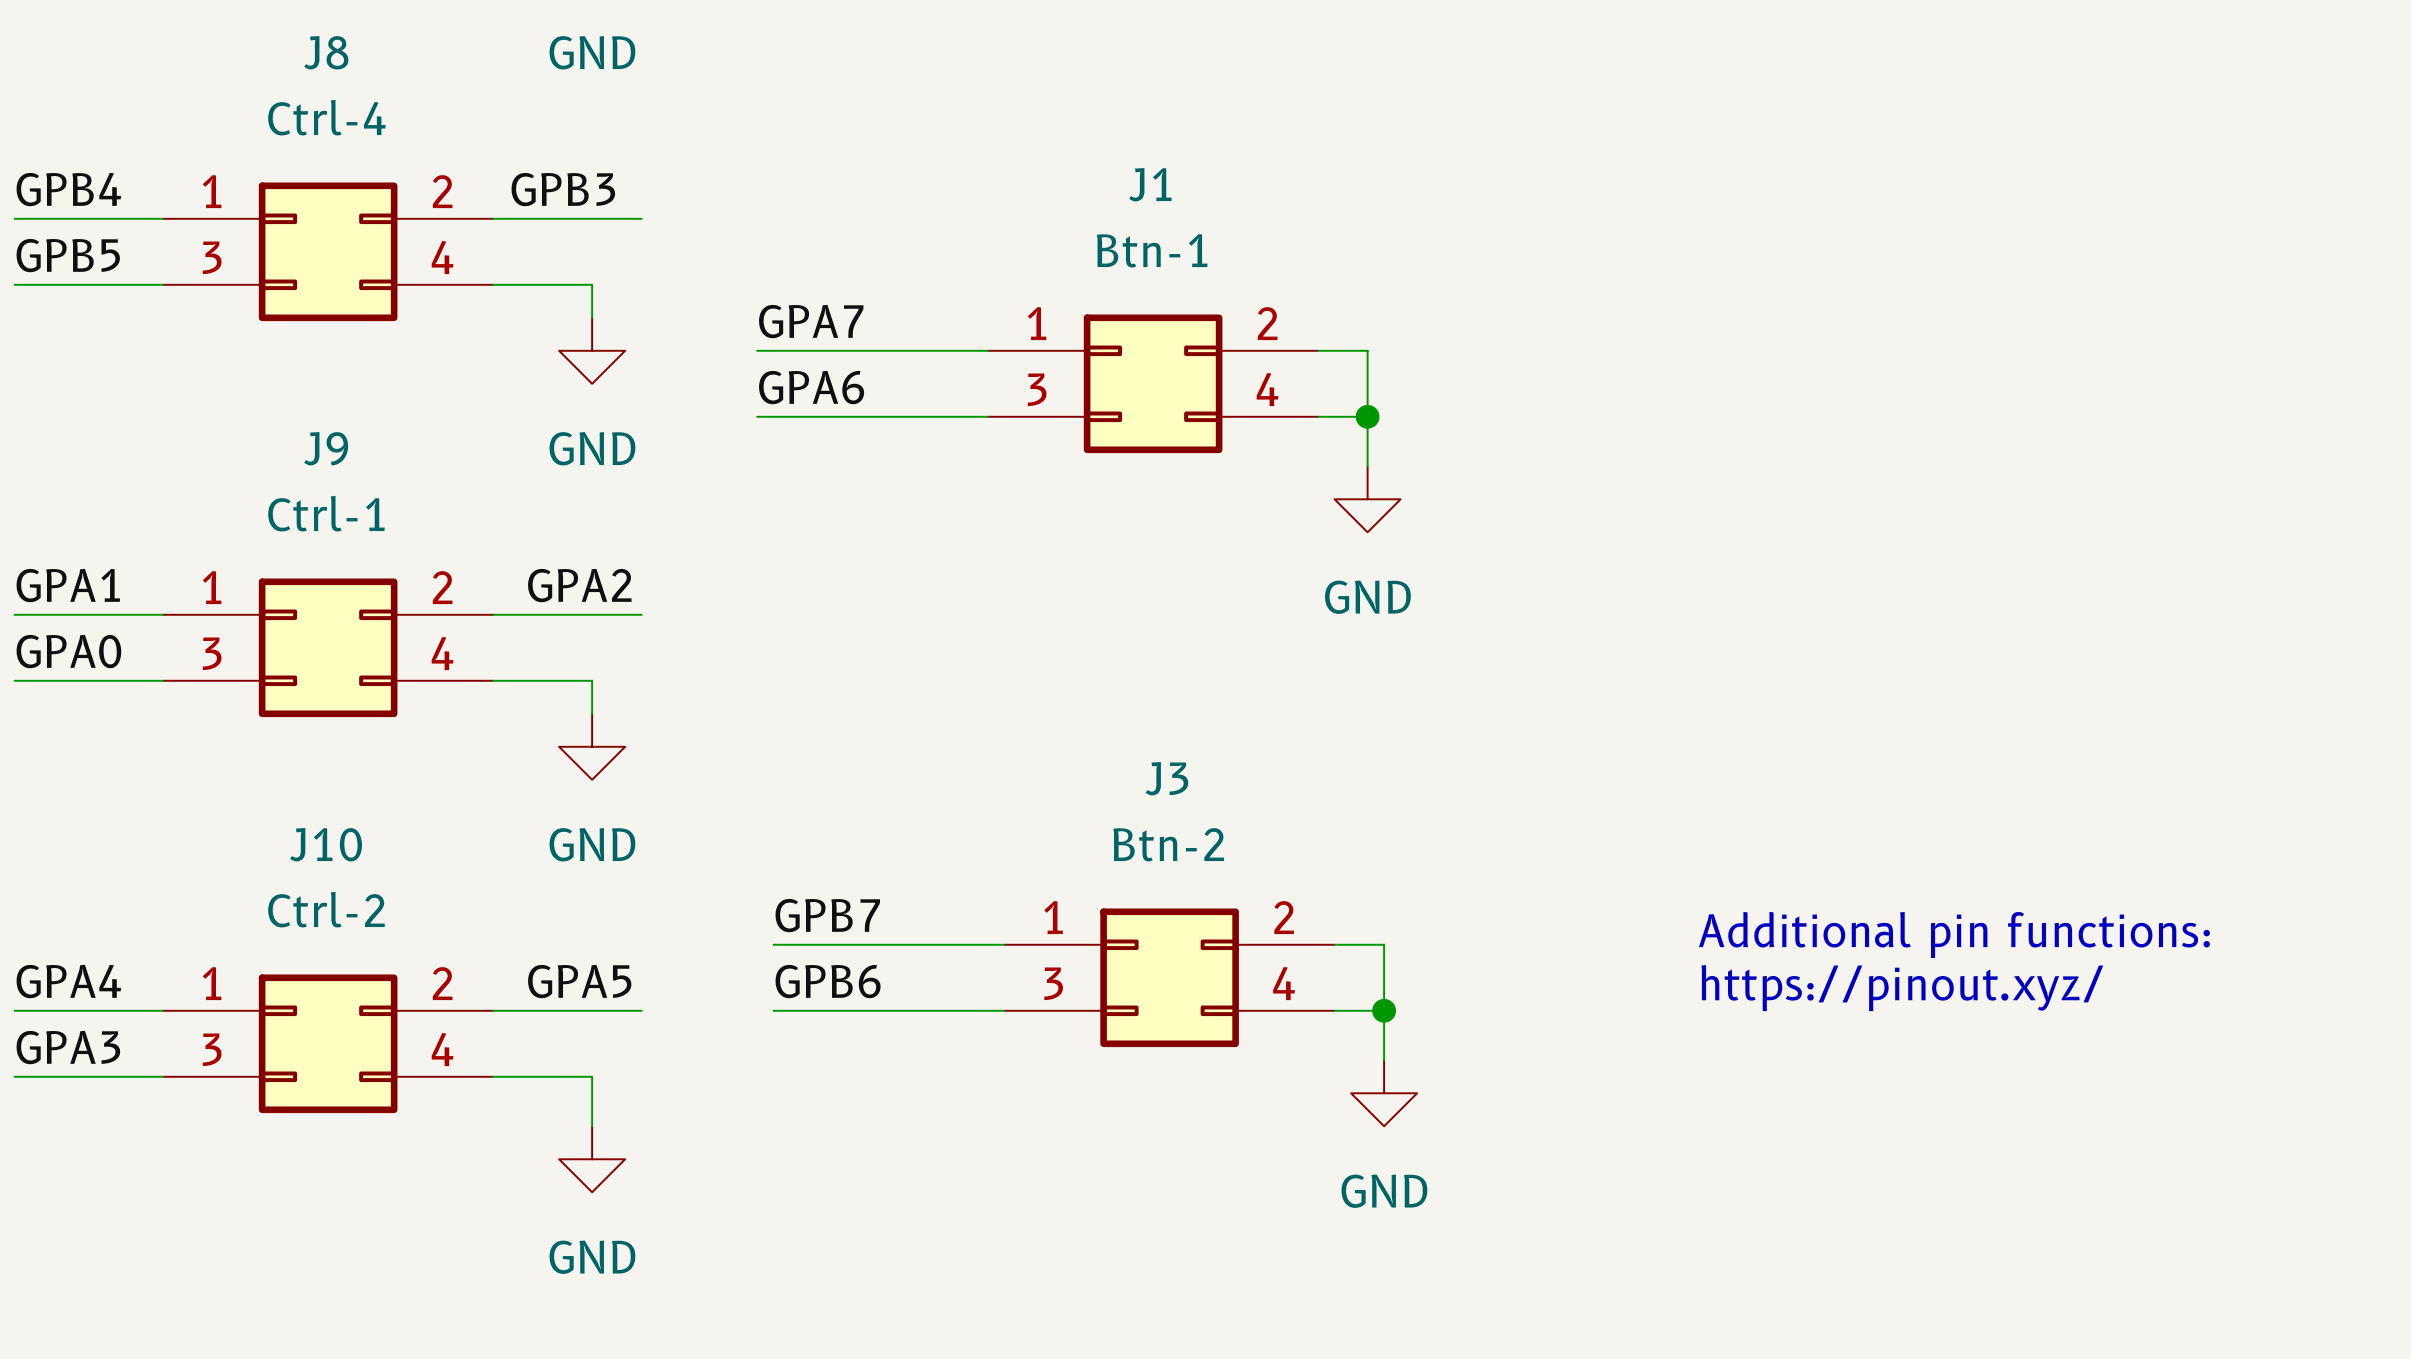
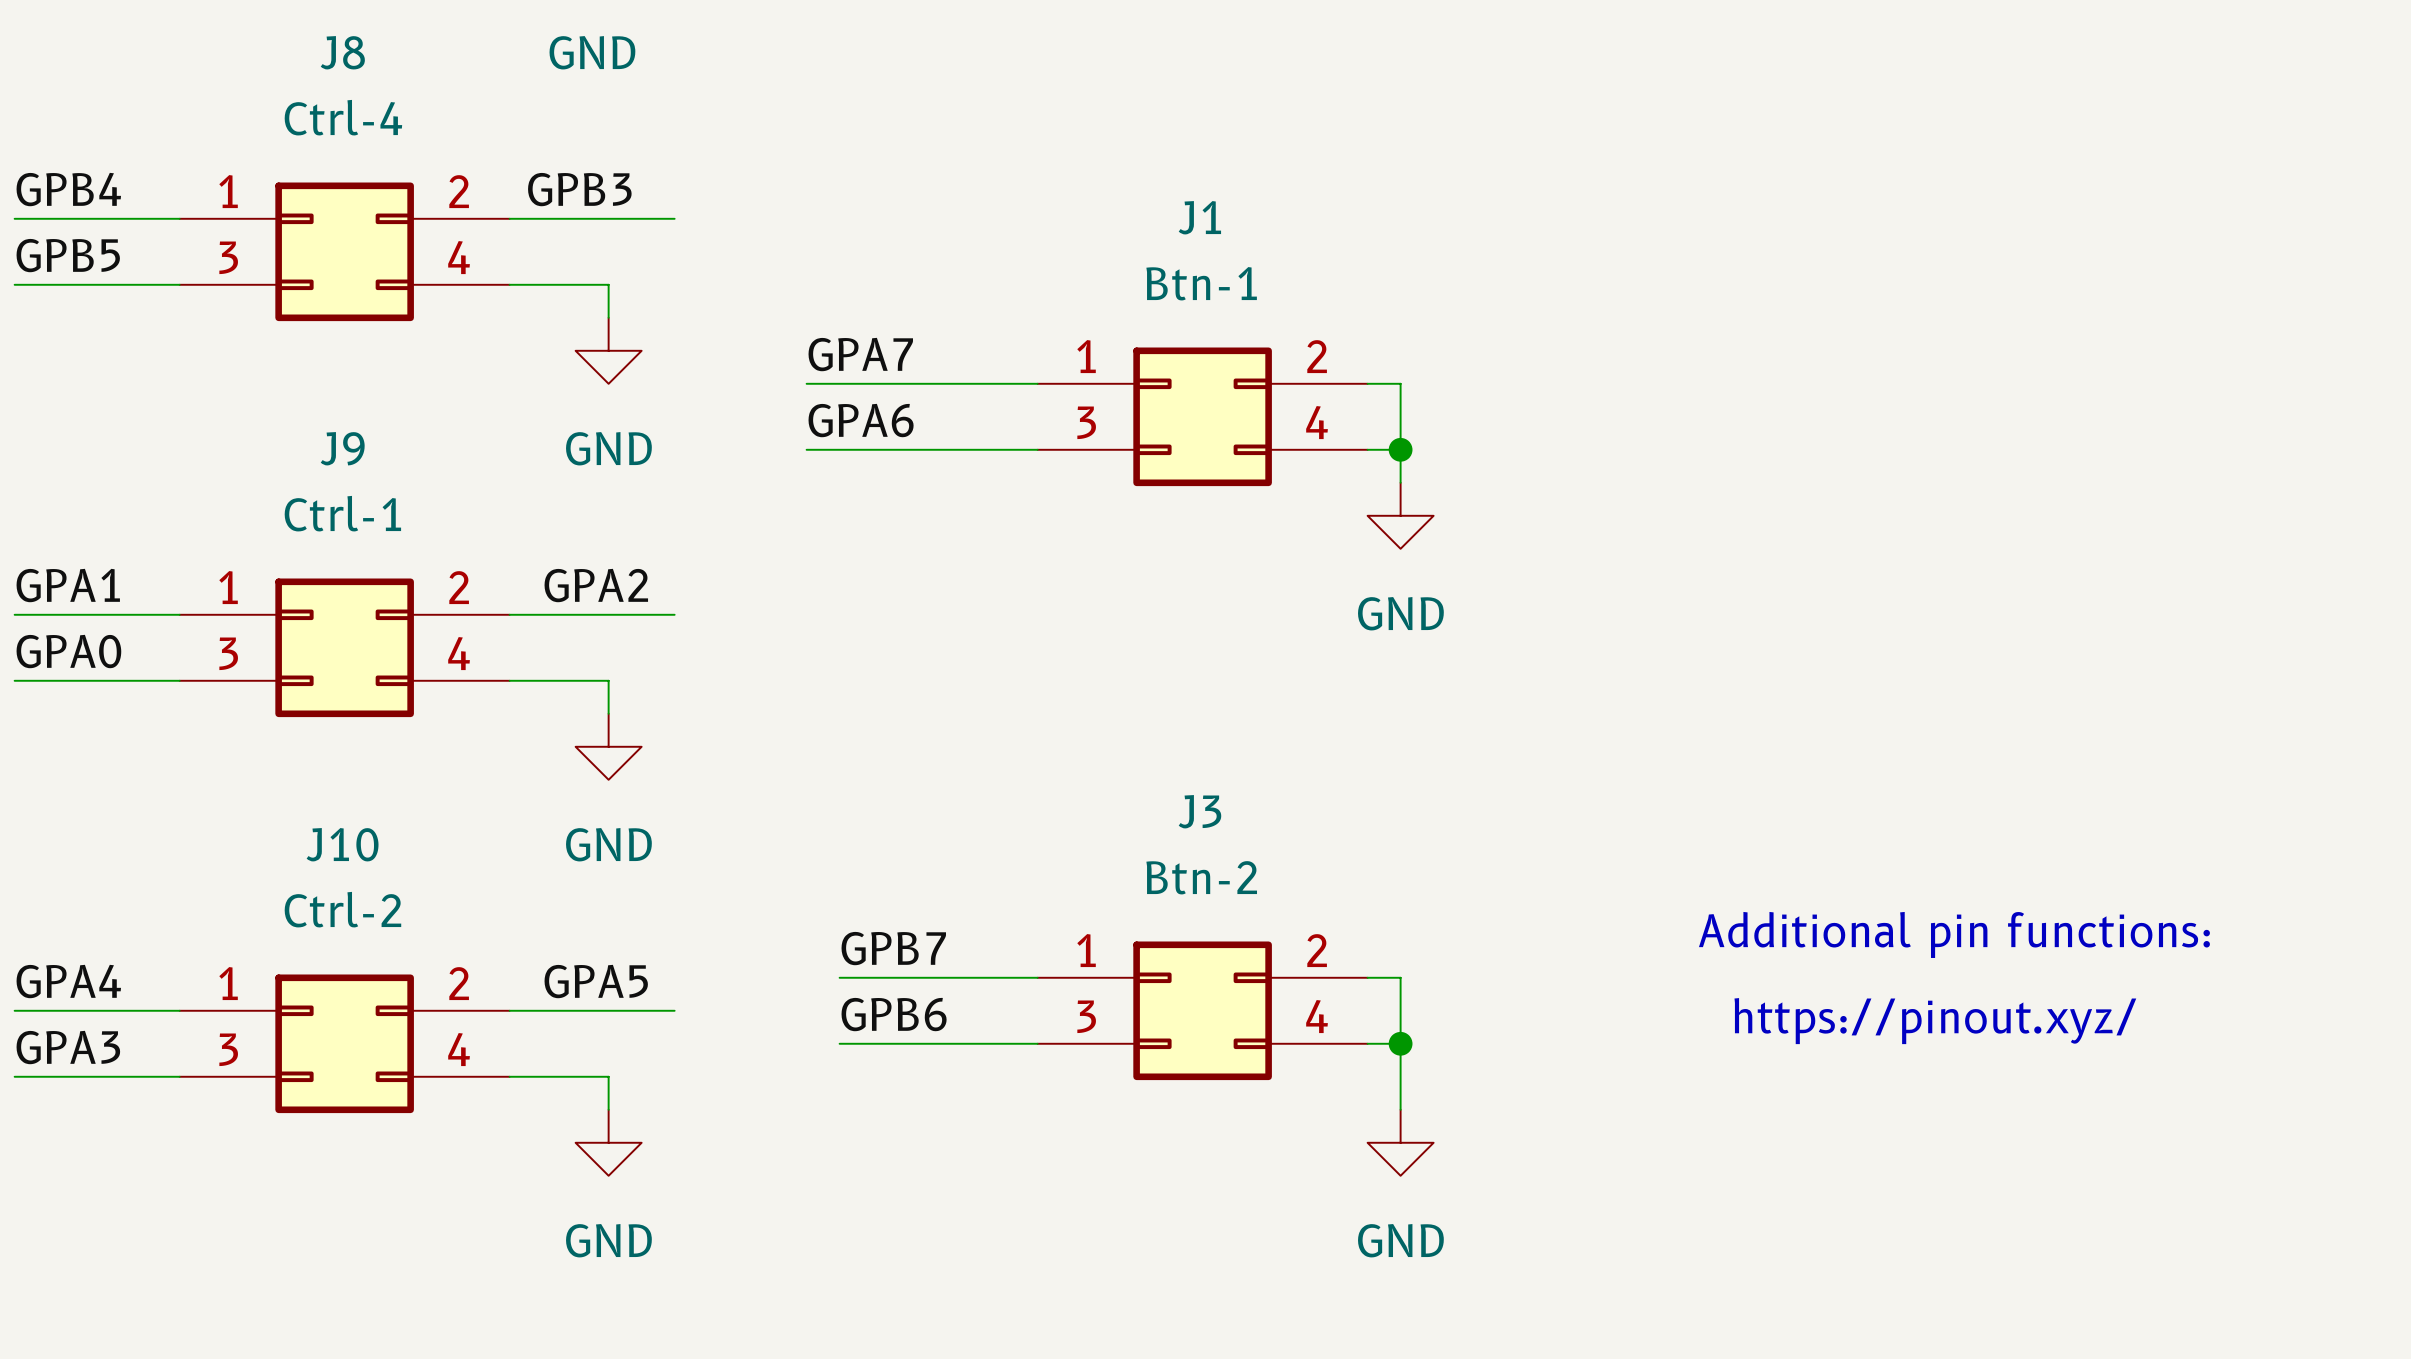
label position: GPB3 (563, 189) -> GPB3 (579, 189)
wire: none -> (641, 218) (674, 218)
J8 position: (328, 251) -> (344, 251)
wire: (592, 284) (592, 317) -> (592, 284) (608, 284) (608, 317)
label position: GPA7 (811, 321) -> GPA7 (860, 354)
power symbol position: GND (592, 350) -> GND (608, 350)
wire: (757, 350) (988, 350) -> (806, 383) (1037, 383)
wire: (1318, 350) (1367, 350) (1367, 466) -> none
J1 position: (1153, 383) -> (1202, 416)
wire: none -> (1367, 383) (1400, 383) (1400, 482)
label position: GPA6 (811, 387) -> GPA6 (861, 420)
wire: (757, 416) (988, 416) -> (806, 449) (1037, 449)
wire: (1318, 416) (1367, 416) -> none
junction position: (1367, 416) -> (1400, 449)
wire: none -> (1367, 449) (1400, 449)
power symbol position: GND (1367, 499) -> GND (1400, 515)
label position: GPA2 (579, 585) -> GPA2 (596, 585)
wire: none -> (641, 614) (674, 614)
J9 position: (328, 647) -> (344, 647)
wire: (592, 680) (592, 713) -> (592, 680) (608, 680) (608, 713)
power symbol position: GND (592, 746) -> GND (608, 746)
label position: GPB7 (827, 915) -> GPB7 (893, 948)
wire: (773, 944) (1004, 944) -> none
wire: (1334, 944) (1384, 944) (1384, 1060) -> none
wire: none -> (839, 977) (1037, 977)
J3 position: (1169, 977) -> (1202, 1010)
wire: none -> (1367, 977) (1400, 977) (1400, 1109)
label position: GPA5 (579, 981) -> GPA5 (596, 981)
label position: GPB6 (828, 981) -> GPB6 (894, 1014)
text position: https://pinout.xyz/ (1902, 988) -> https://pinout.xyz/ (1935, 1021)
wire: none -> (641, 1010) (674, 1010)
wire: (773, 1010) (1004, 1010) -> none
wire: (1334, 1010) (1384, 1010) -> none
junction position: (1384, 1010) -> (1400, 1043)
J10 position: (328, 1043) -> (344, 1043)
wire: none -> (839, 1043) (1037, 1043)
wire: none -> (1367, 1043) (1400, 1043)
wire: (592, 1076) (592, 1126) -> (592, 1076) (608, 1076) (608, 1109)
power symbol position: GND (1384, 1093) -> GND (1400, 1142)
power symbol position: GND (592, 1159) -> GND (608, 1142)

